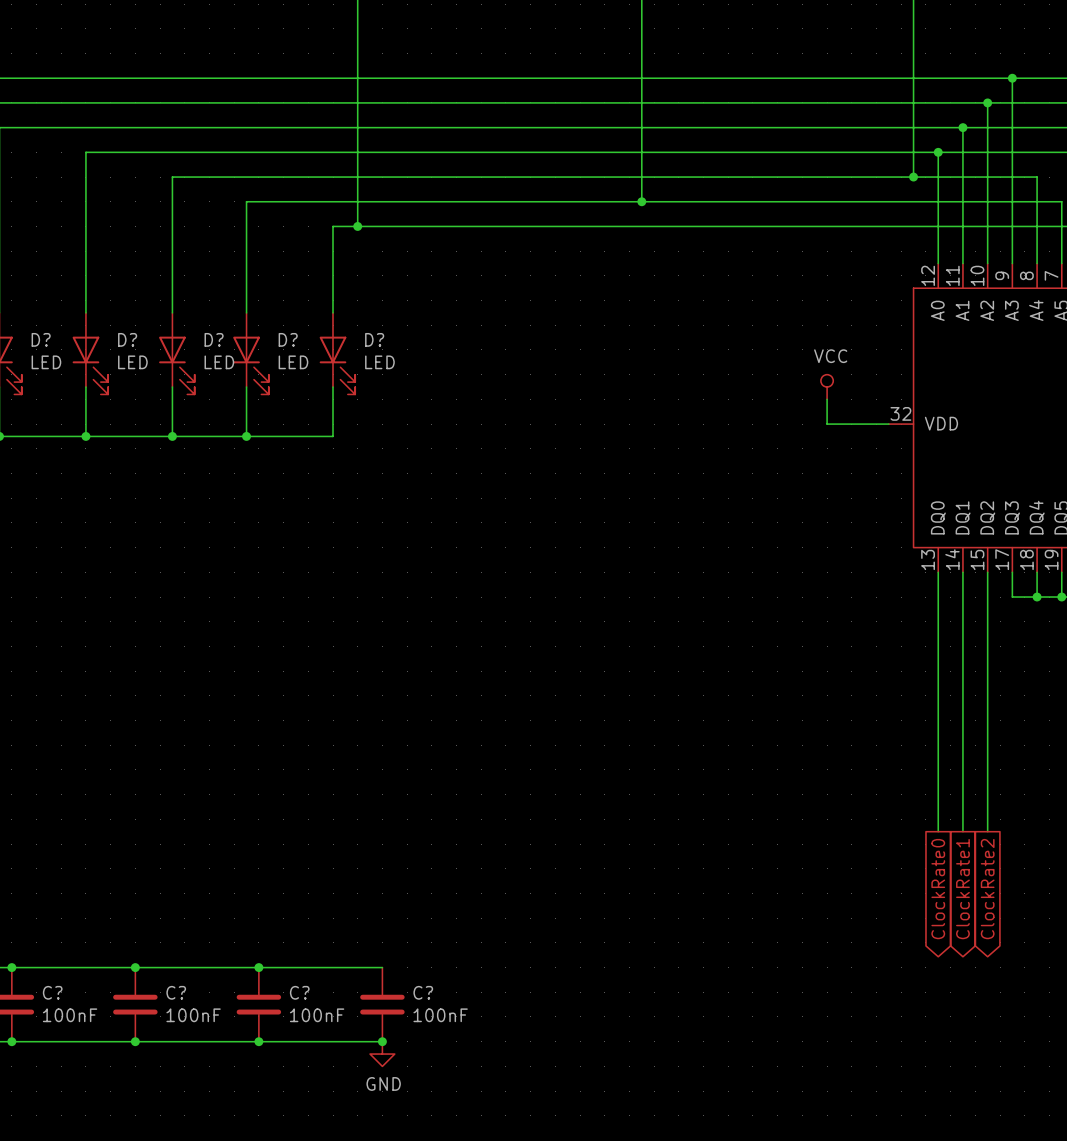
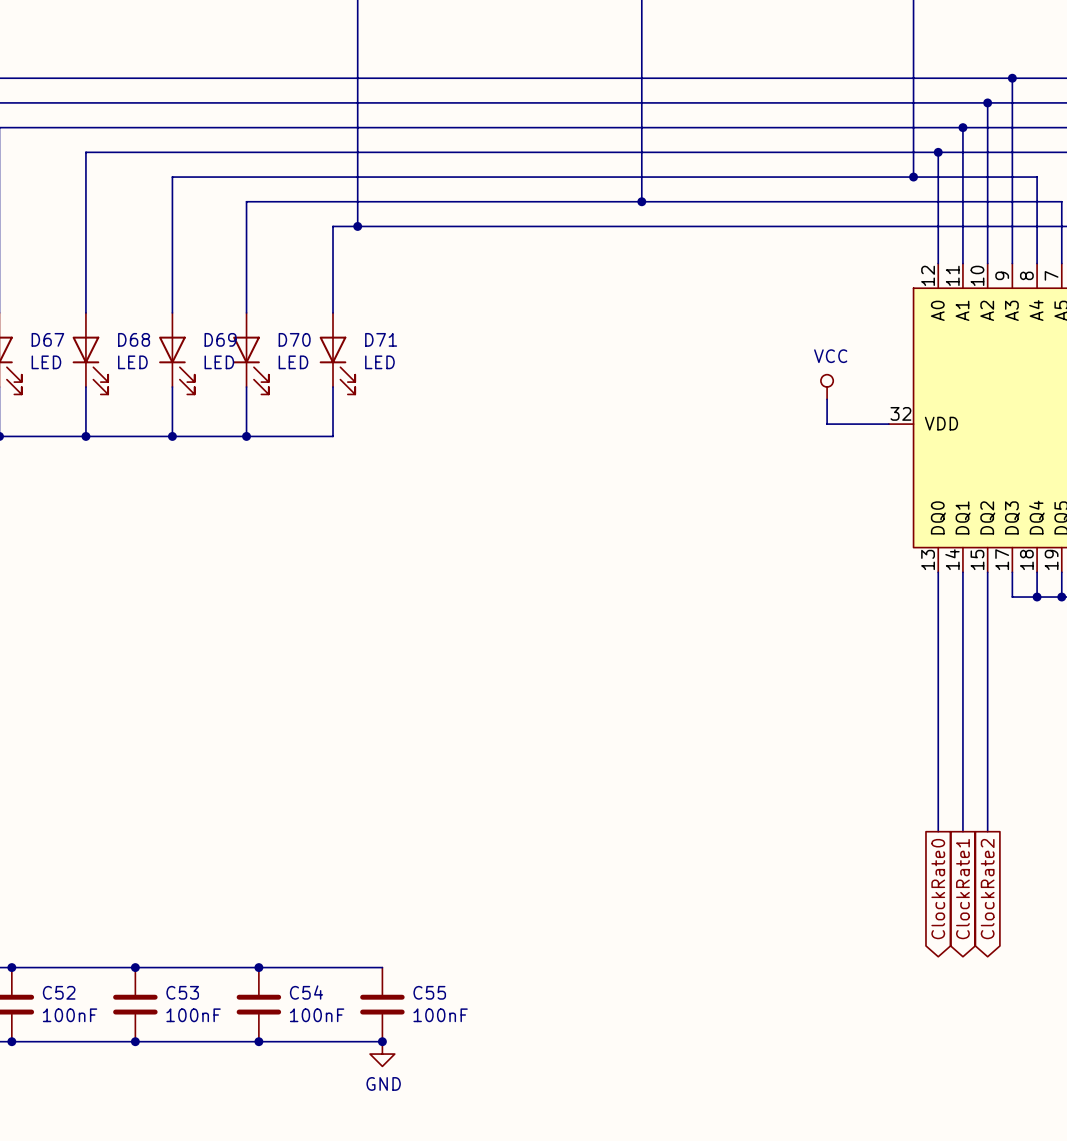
D? name: D? (41, 339) -> D67 (47, 339)
D? name: D? (127, 339) -> D68 (134, 339)
D? name: D? (214, 339) -> D69 (220, 339)
D? name: D? (288, 339) -> D70 (294, 339)
D? name: D? (374, 339) -> D71 (381, 339)
C? name: C? (52, 992) -> C52 (59, 992)
C? name: C? (176, 992) -> C53 (182, 992)
C? name: C? (299, 992) -> C54 (306, 992)
C? name: C? (423, 992) -> C55 (429, 992)

